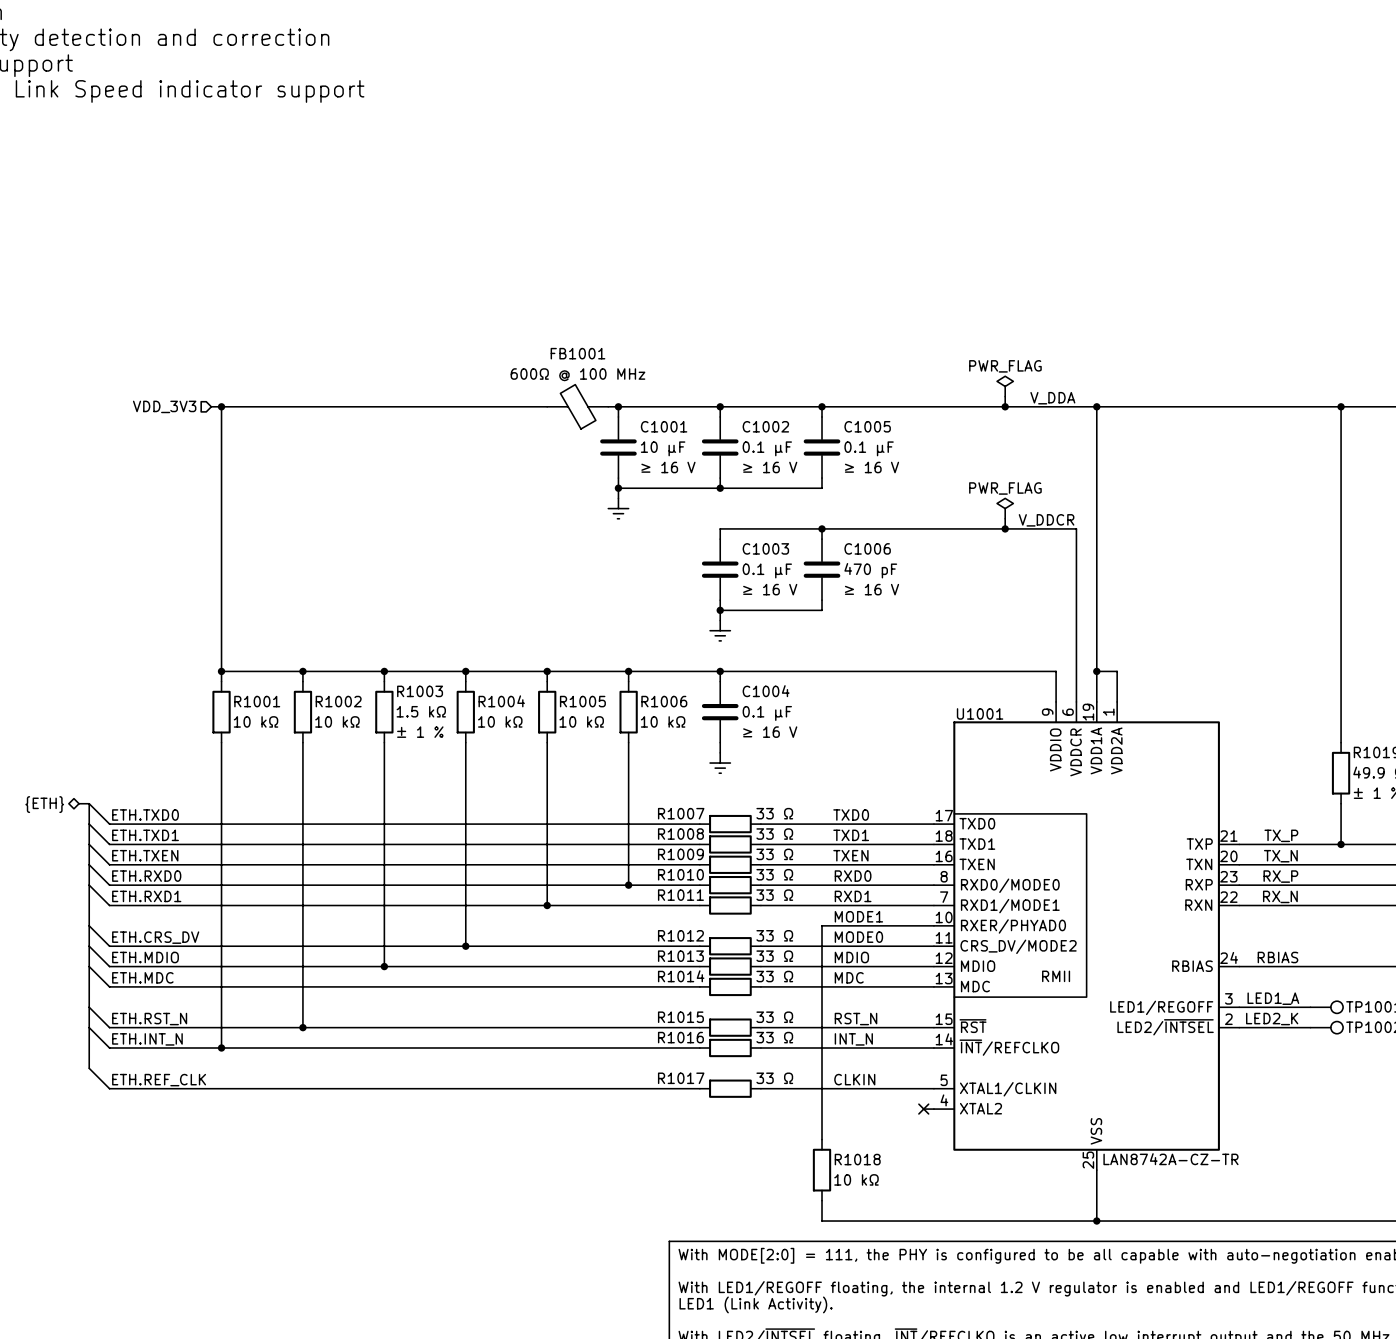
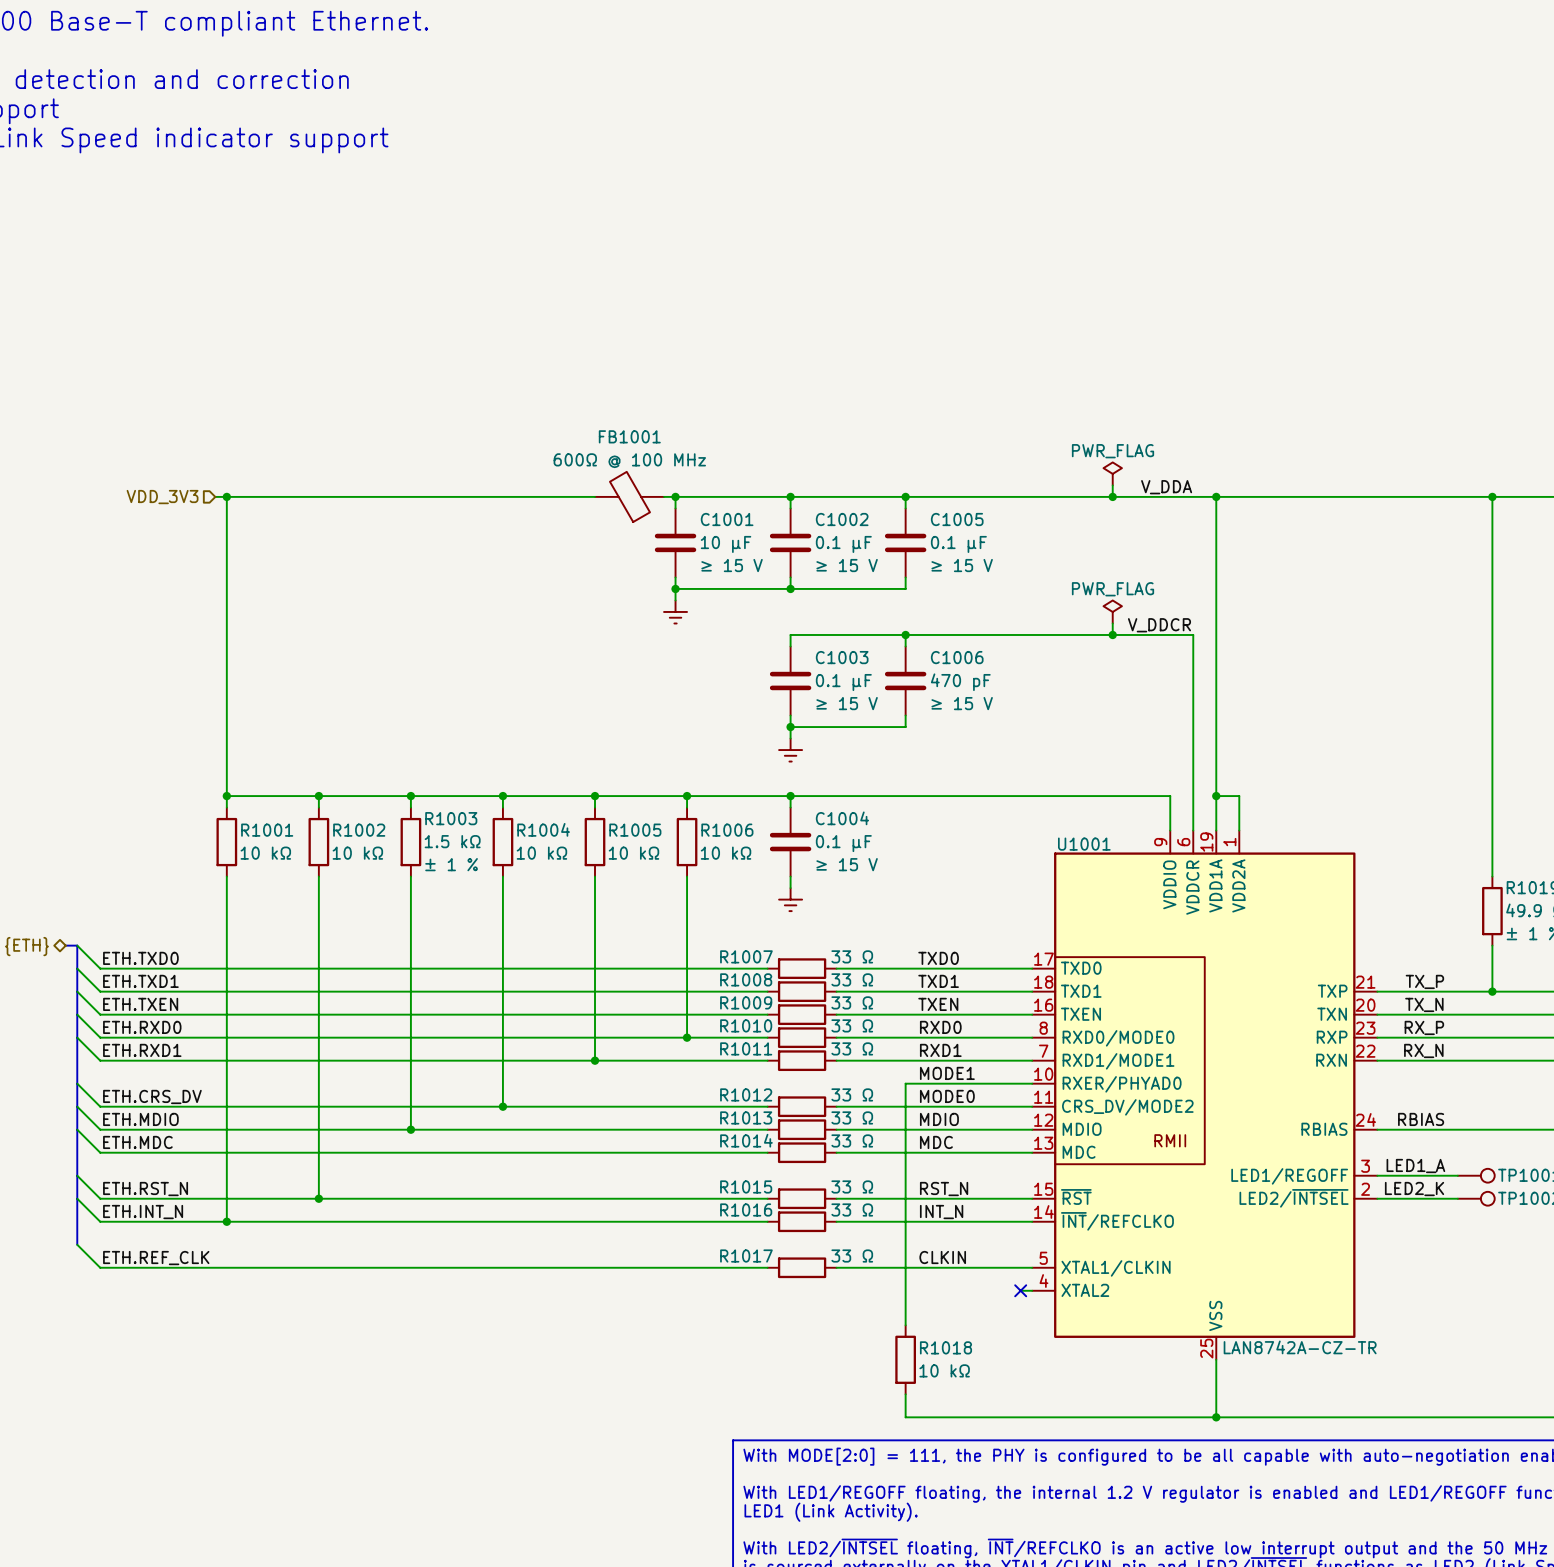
C1001 text: ≥ 16 V (668, 467) -> ≥ 15 V (732, 565)
C1002 text: ≥ 16 V (770, 467) -> ≥ 15 V (847, 565)
C1005 text: ≥ 16 V (871, 467) -> ≥ 15 V (962, 565)
C1003 text: ≥ 16 V (770, 589) -> ≥ 15 V (847, 703)
C1006 text: ≥ 16 V (871, 589) -> ≥ 15 V (962, 703)
C1004 text: ≥ 16 V (770, 732) -> ≥ 15 V (847, 864)

